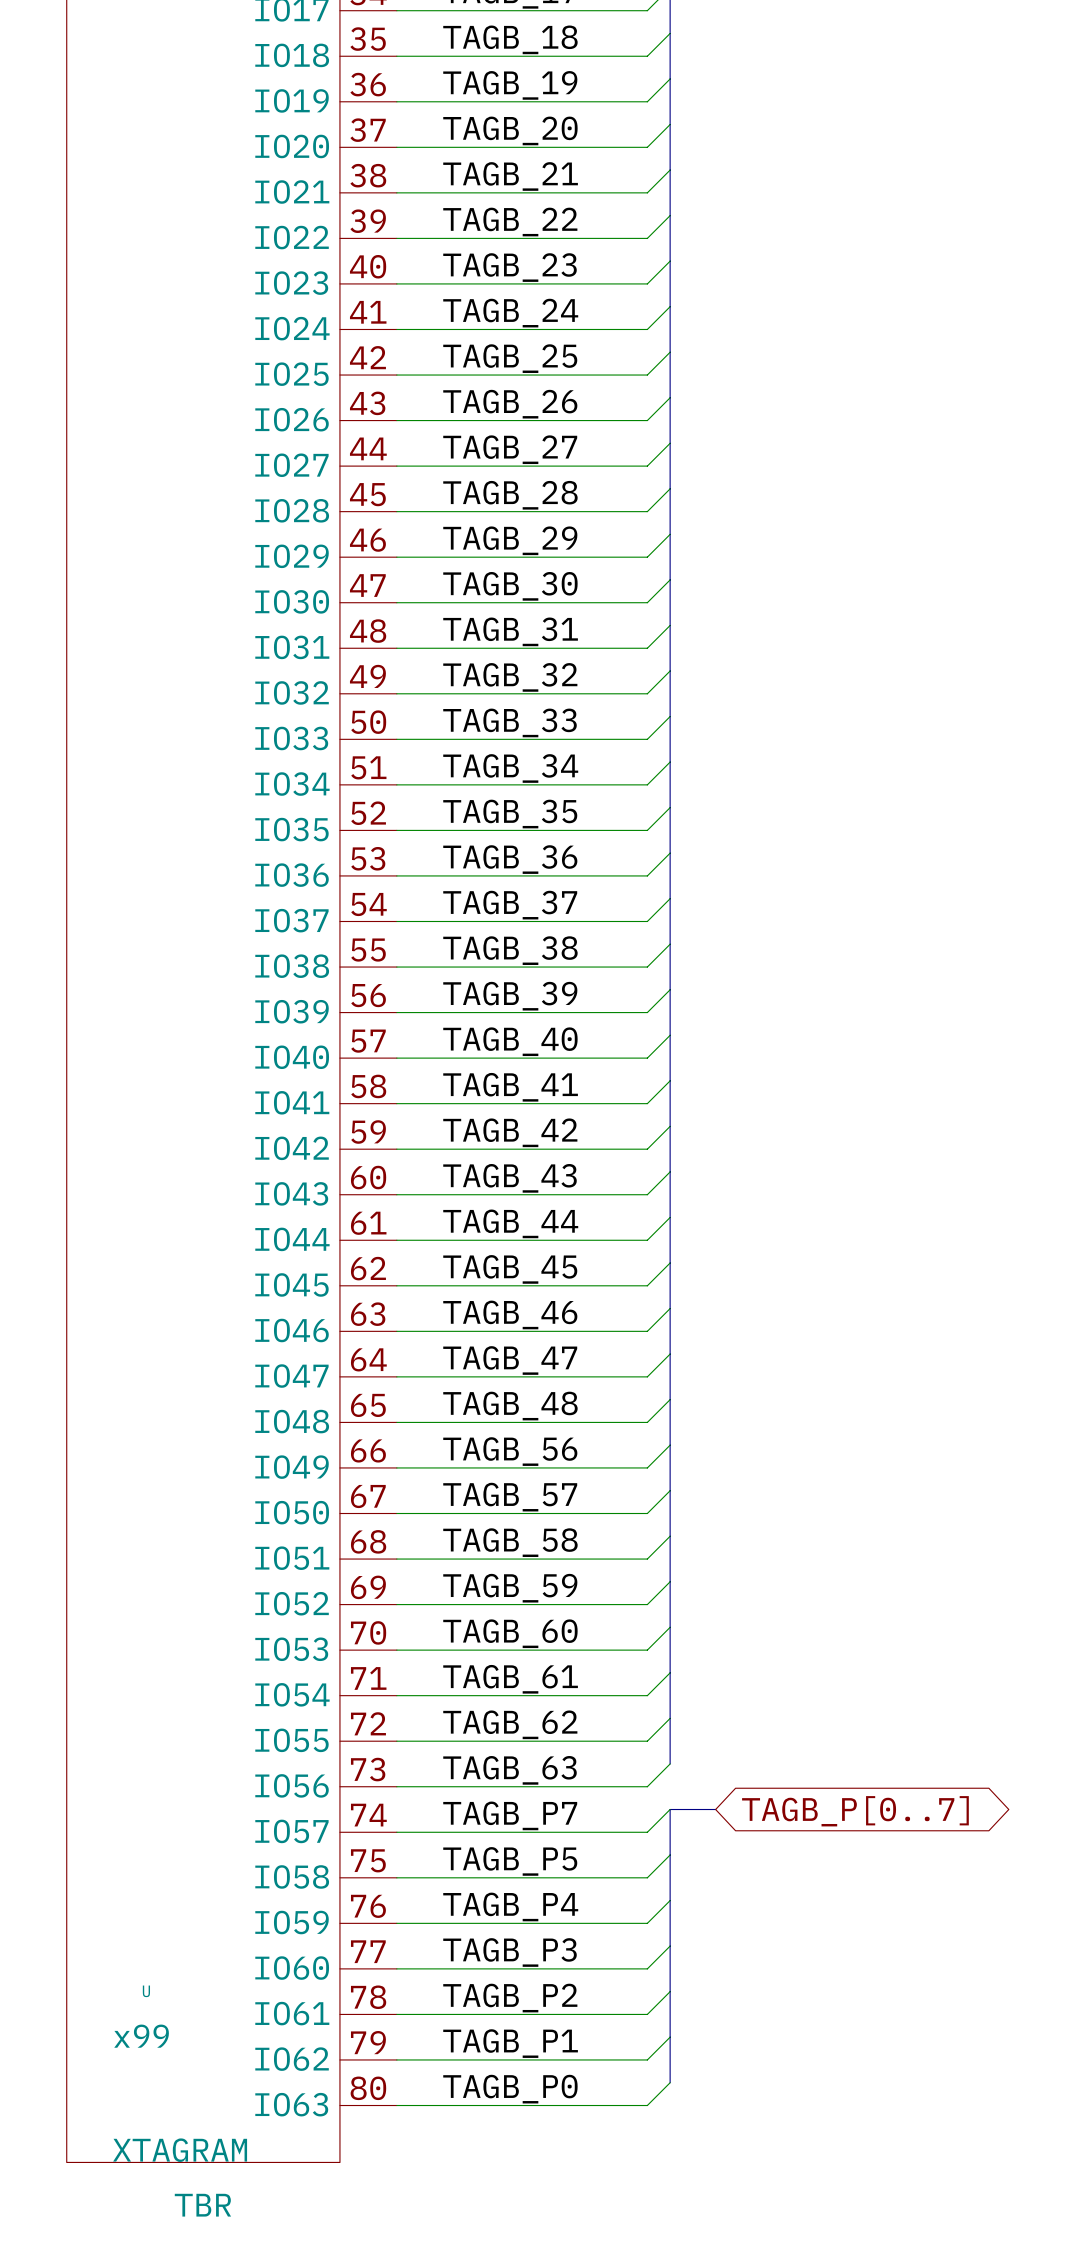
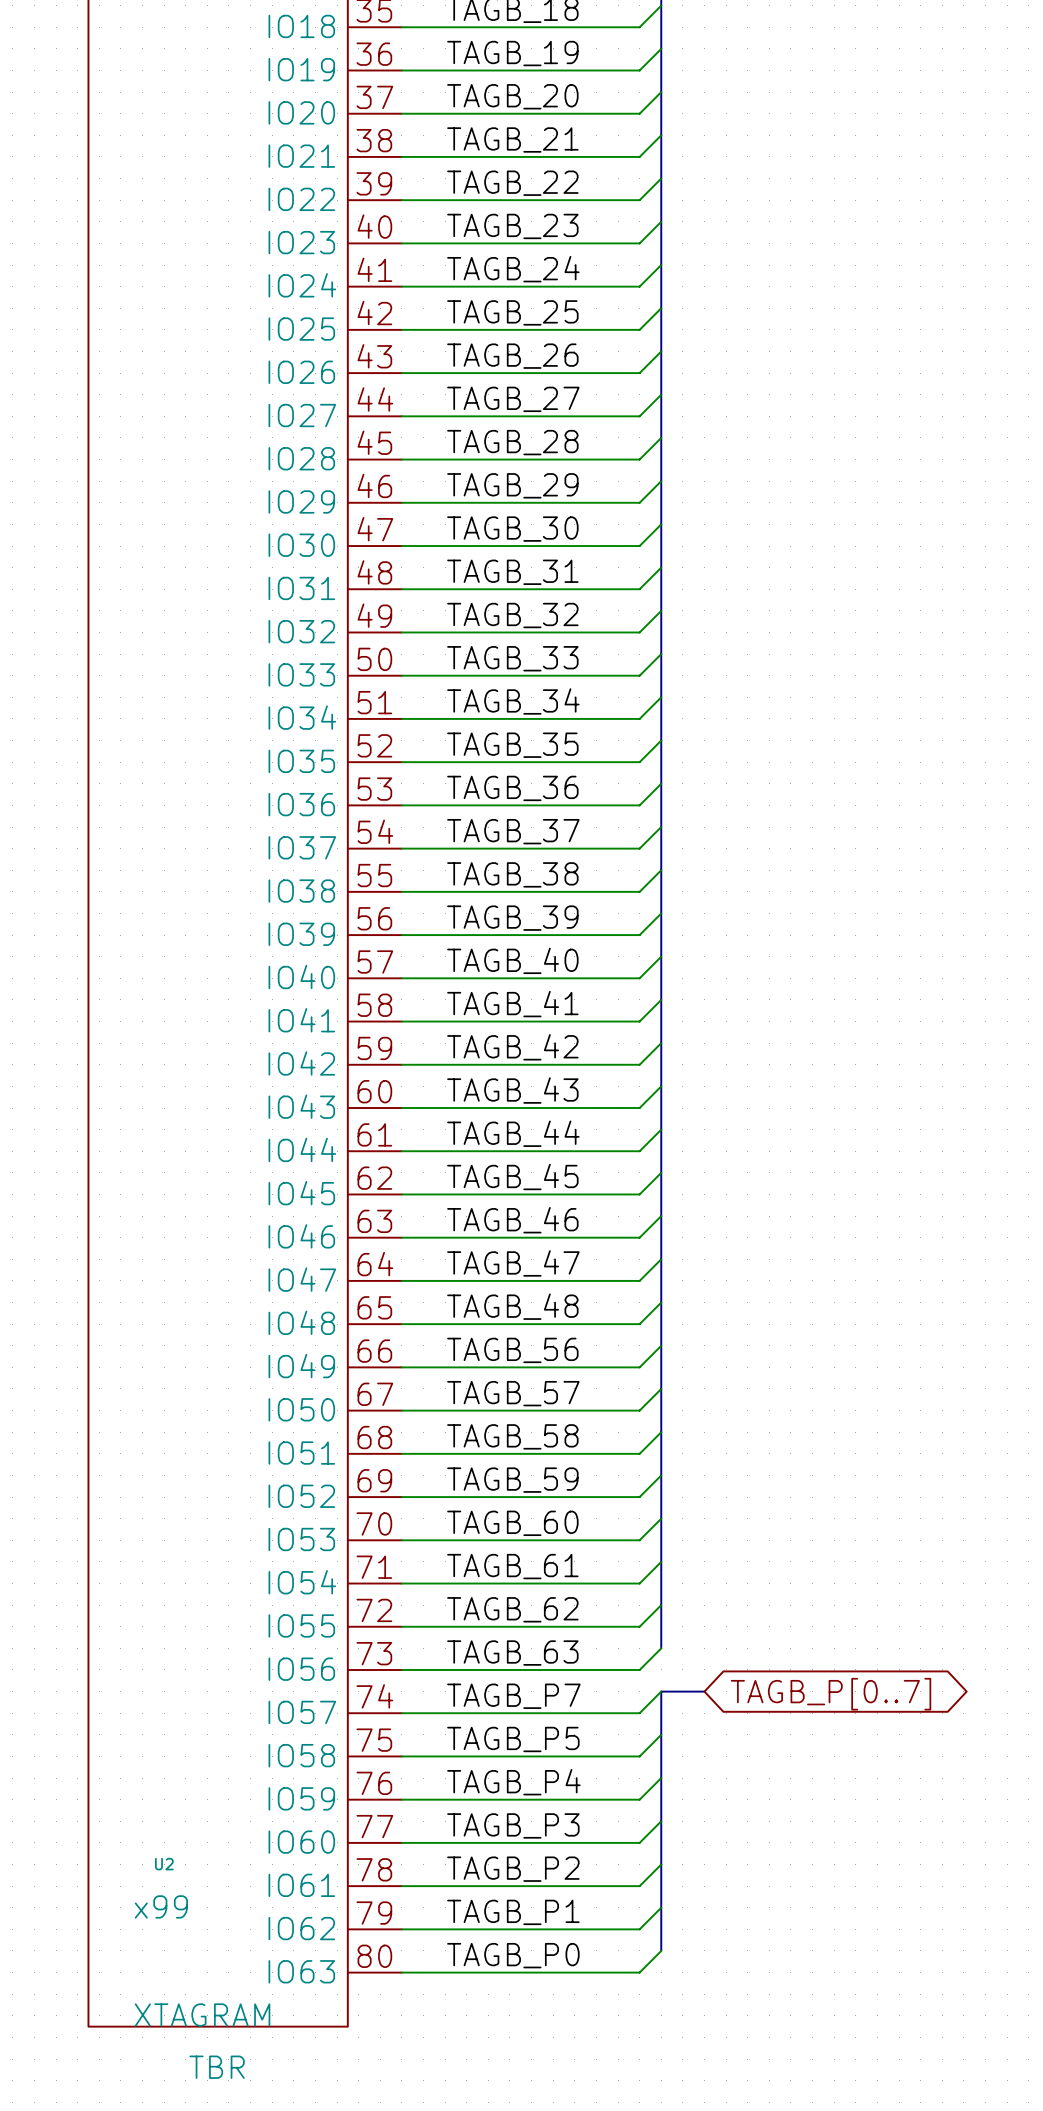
U name: U (146, 1991) -> U2 (164, 1864)

